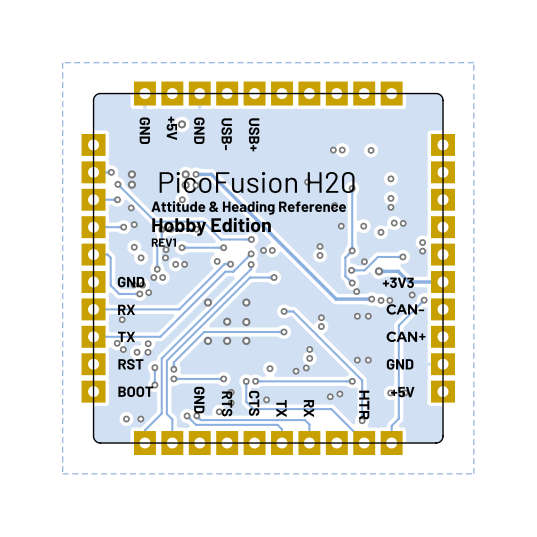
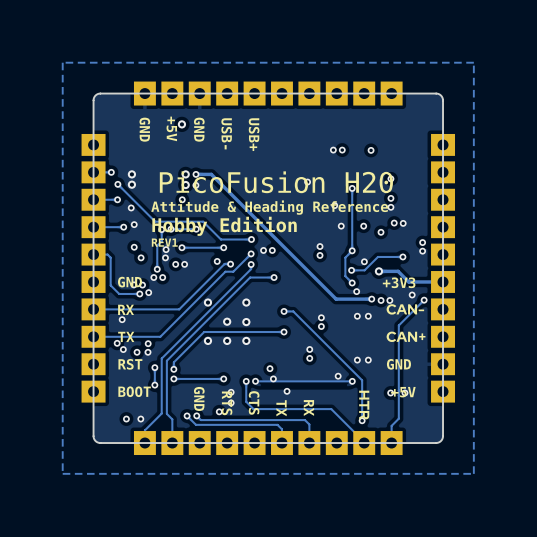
via: (306, 367) -> none
via: (296, 371) -> none
via: none -> (338, 376)
via: none -> (273, 378)
via: none -> (287, 391)
via: (339, 394) -> none
via: (330, 396) -> none
via: (266, 399) -> none

